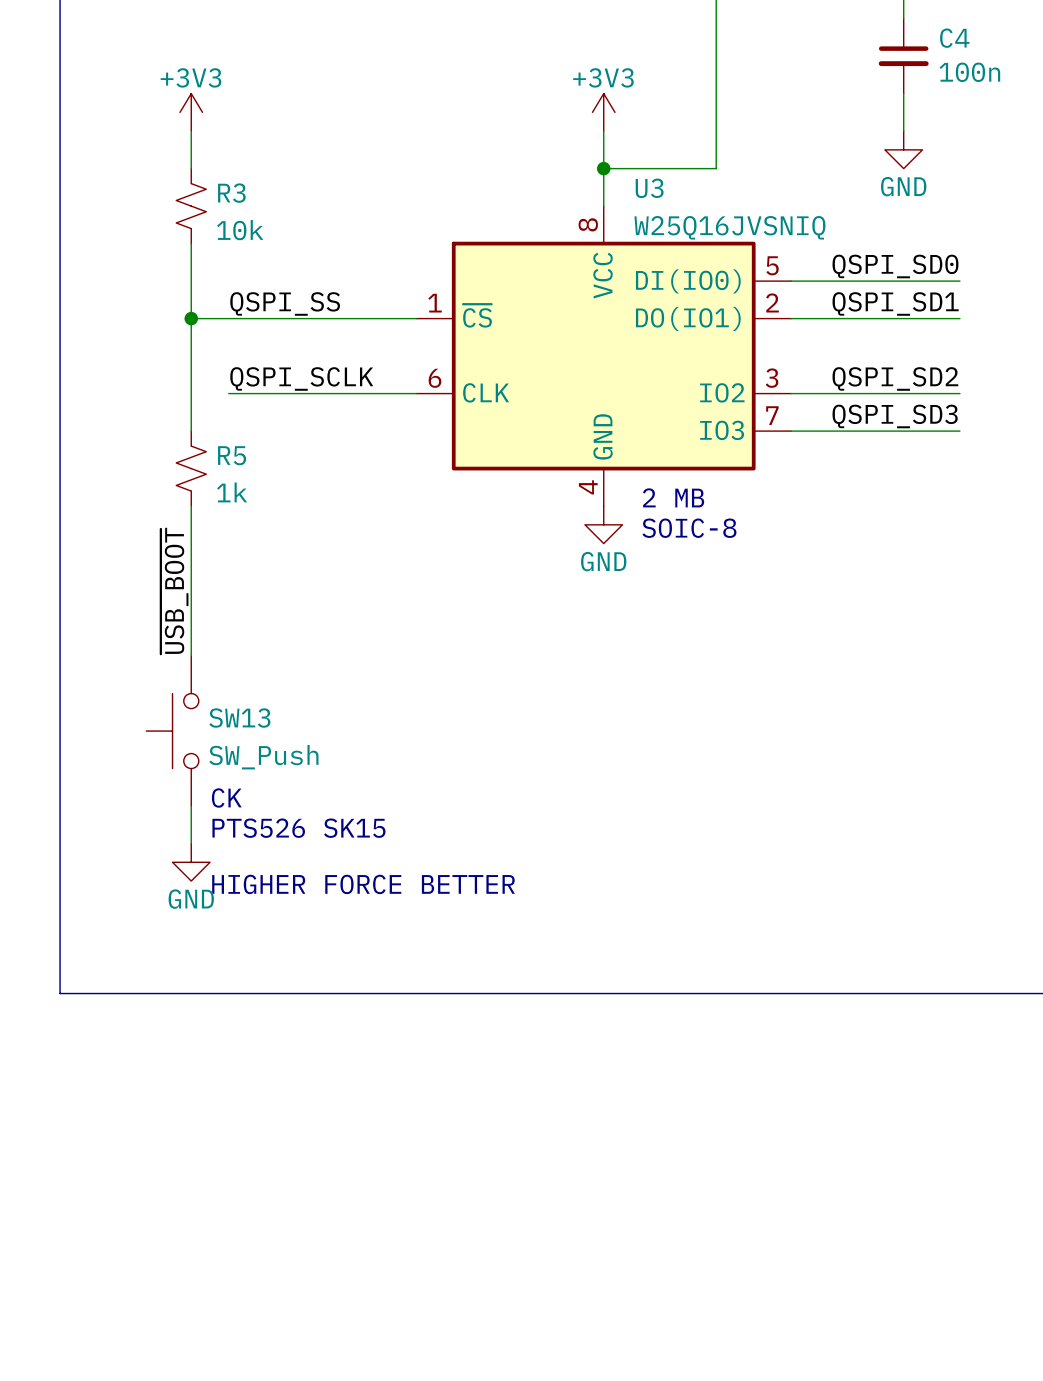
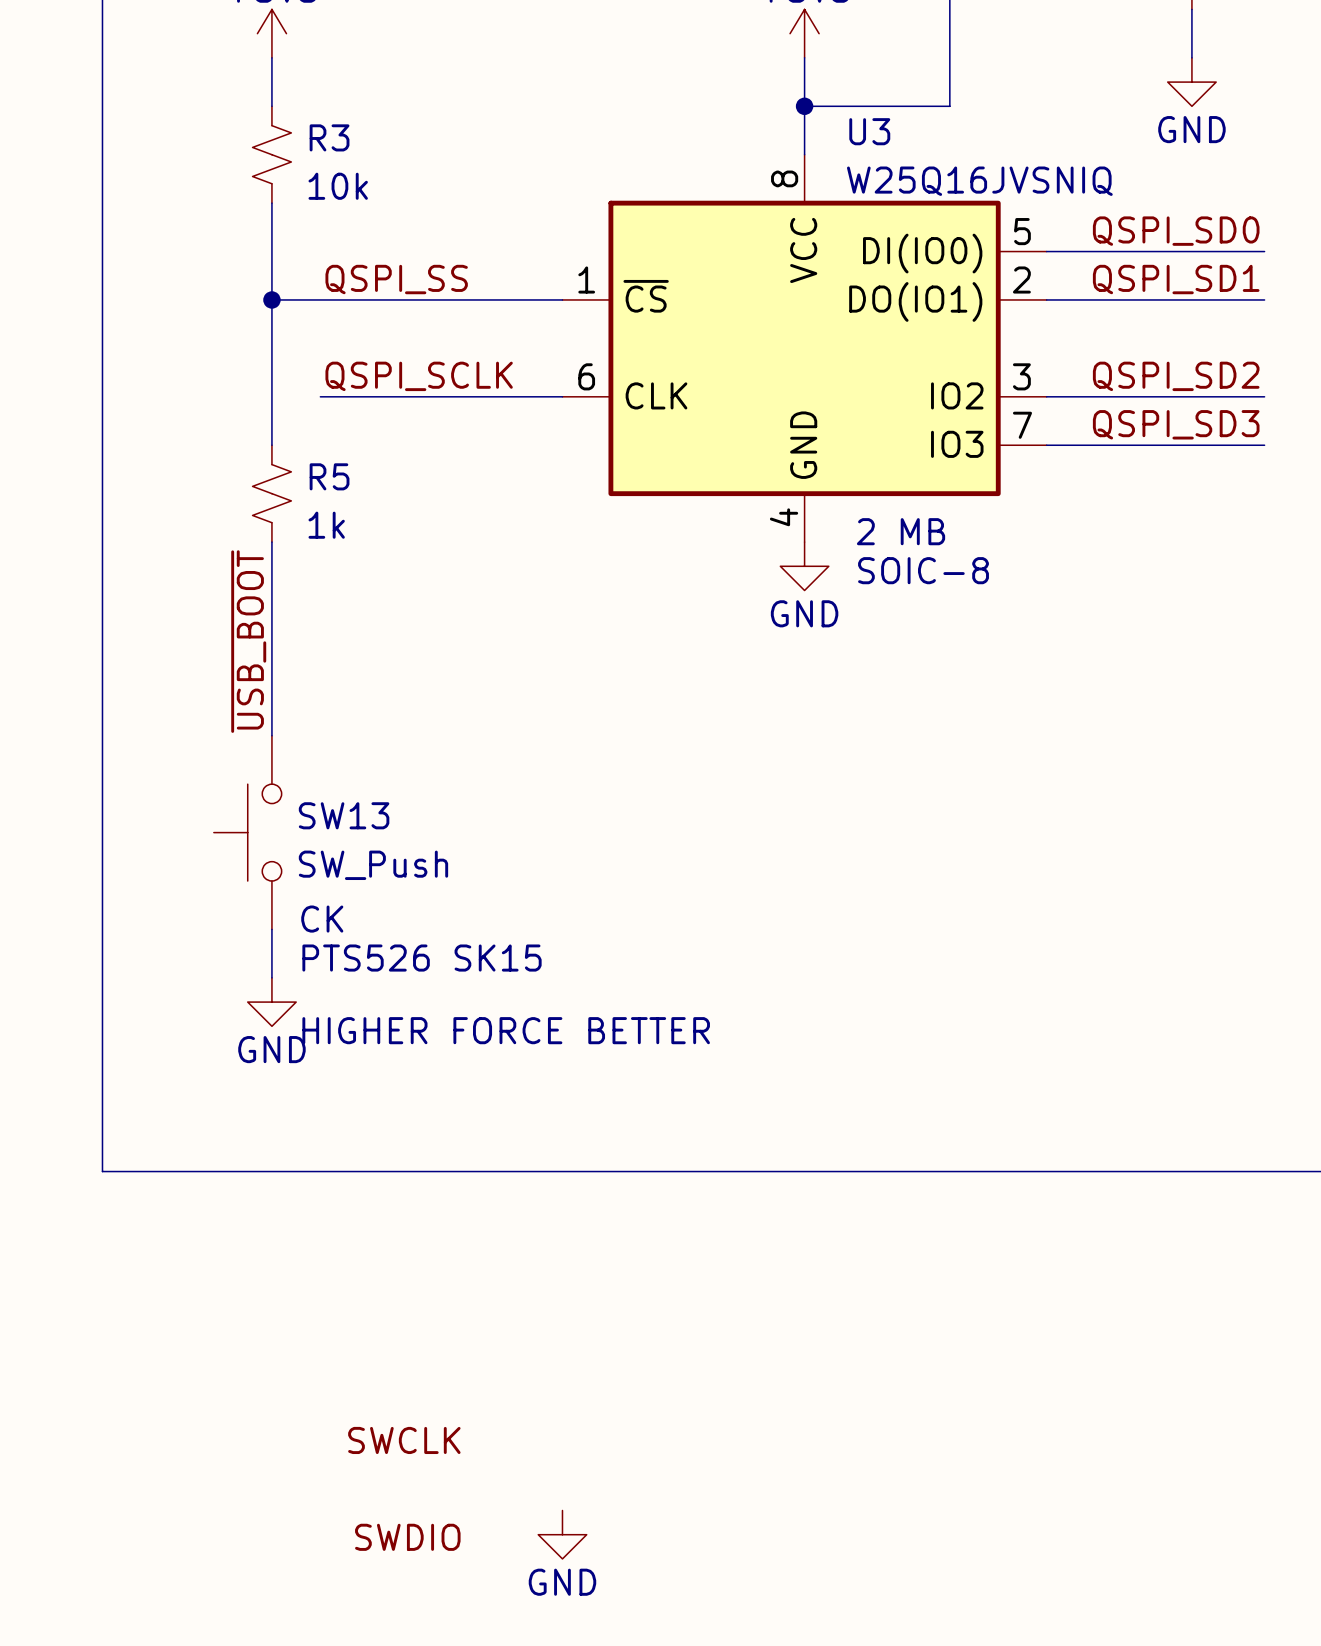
label: none -> SWCLK (404, 1440)
power symbol: none -> GND (562, 1534)
label: none -> SWDIO (407, 1537)

